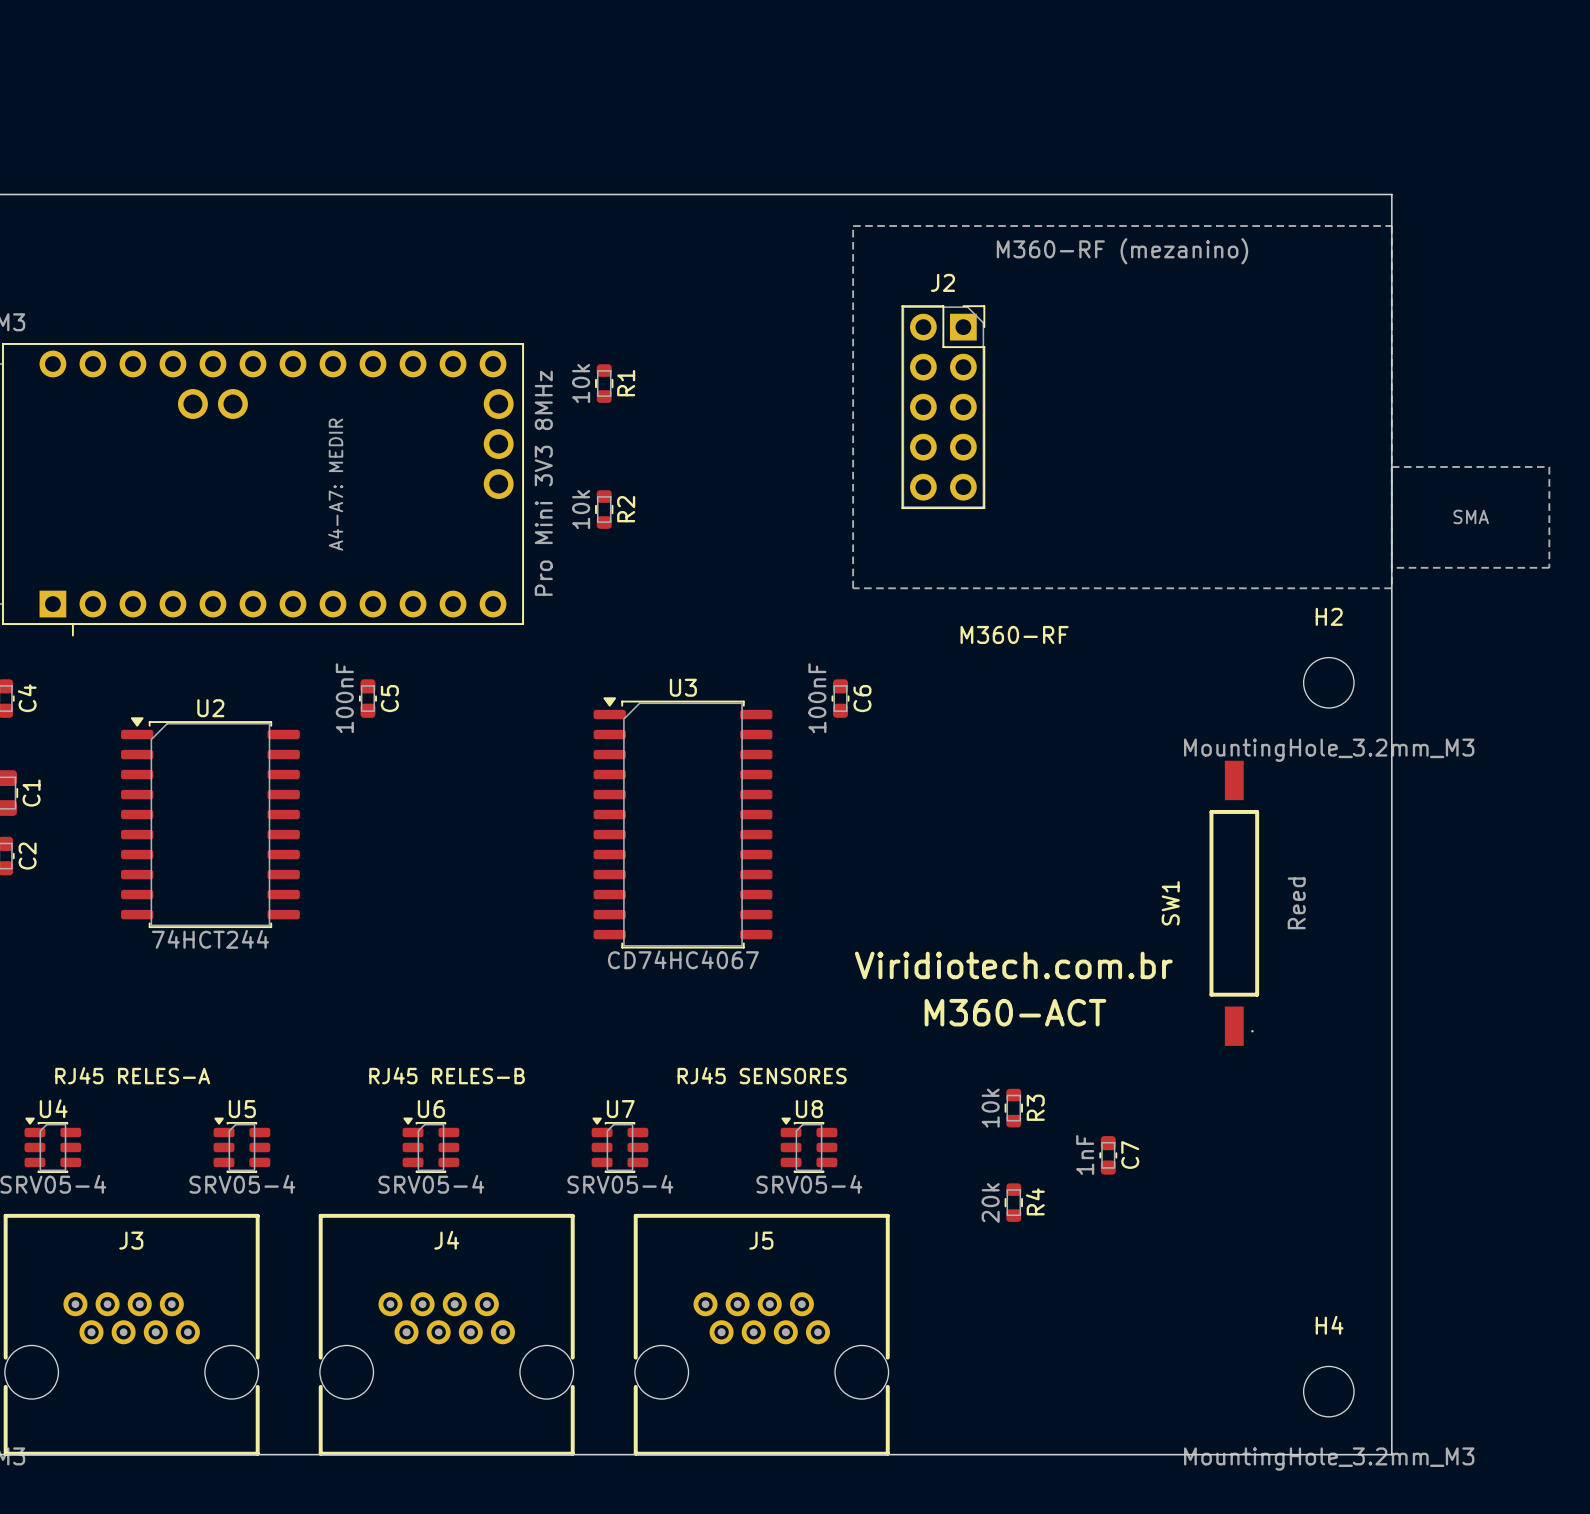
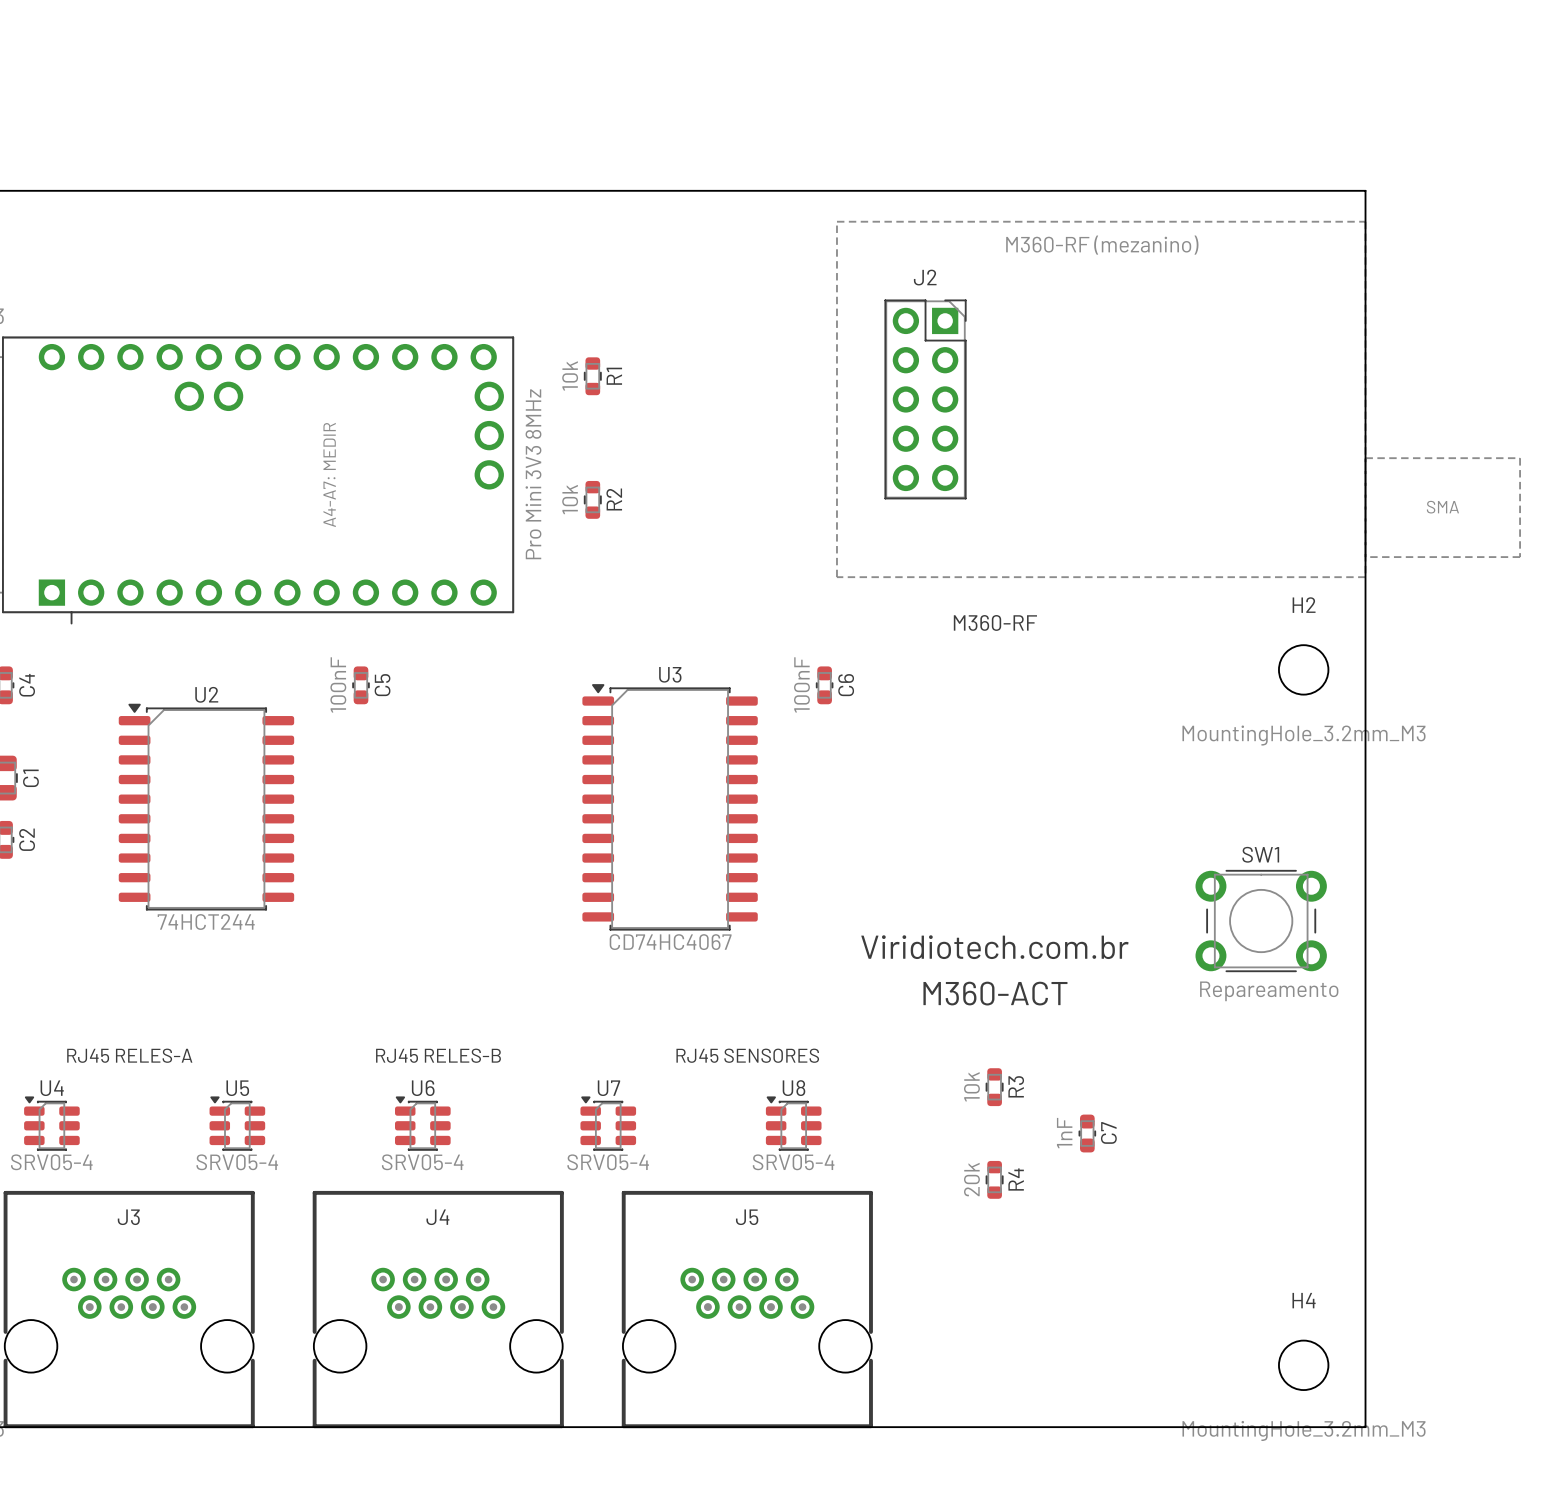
SW1 footprint: [1209, 760, 1260, 1046] -> [1195, 869, 1327, 973]
SW1 name position: SW1 (1170, 903) -> SW1 (1260, 854)
SW1 value: Reed (1296, 903) -> Repareamento (1269, 991)

